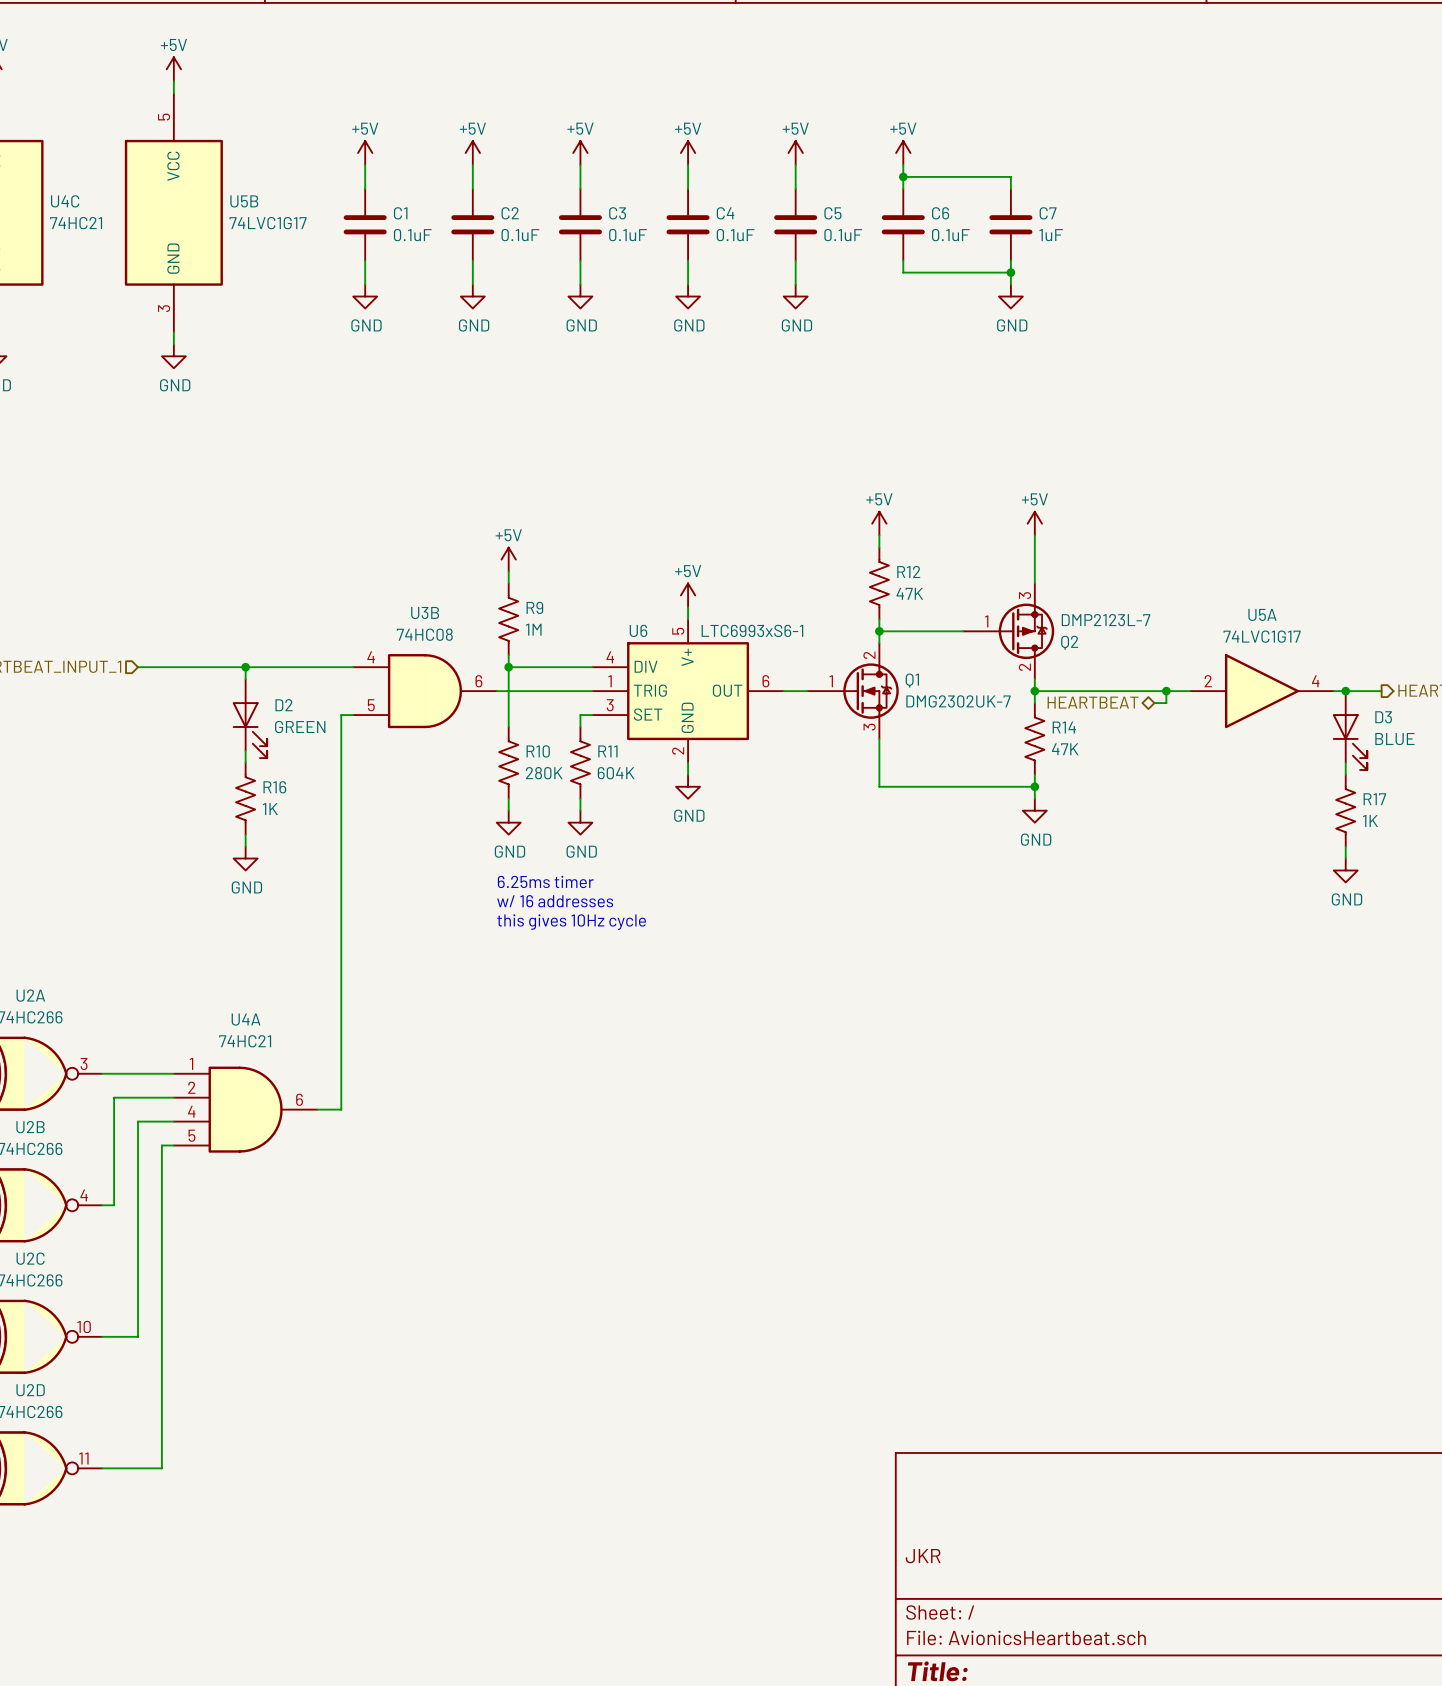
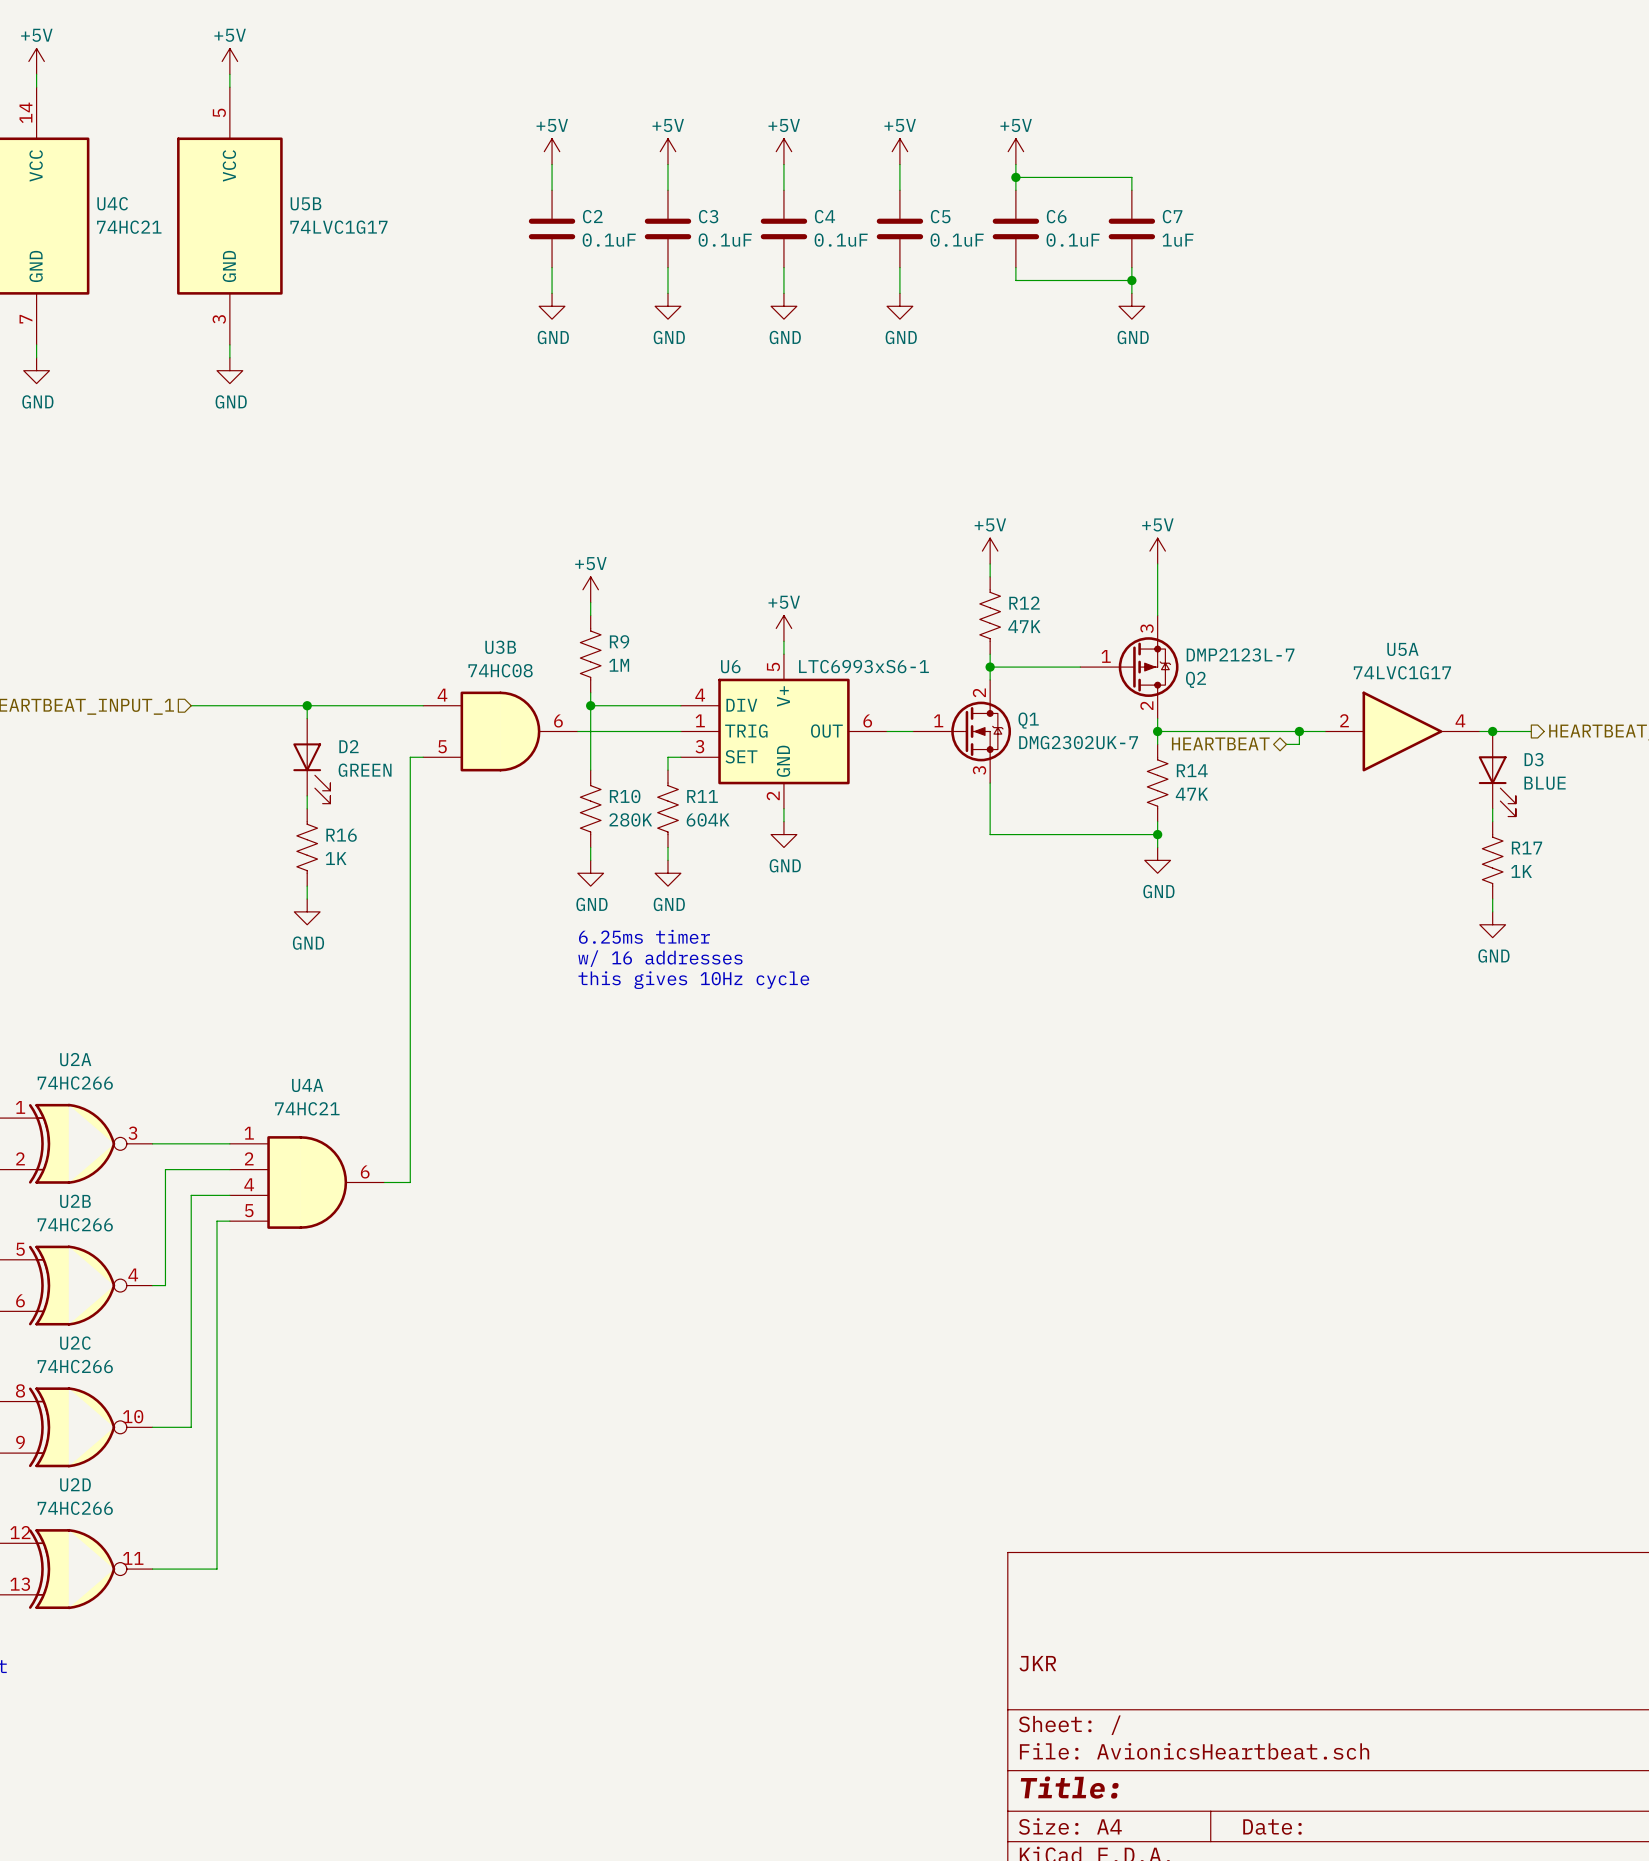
power symbol: +5V (365, 153) -> none
wire: (365, 164) (365, 188) -> none
C1: 0.1uF (365, 224) -> none
wire: (365, 260) (365, 284) -> none
power symbol: GND (365, 296) -> none

